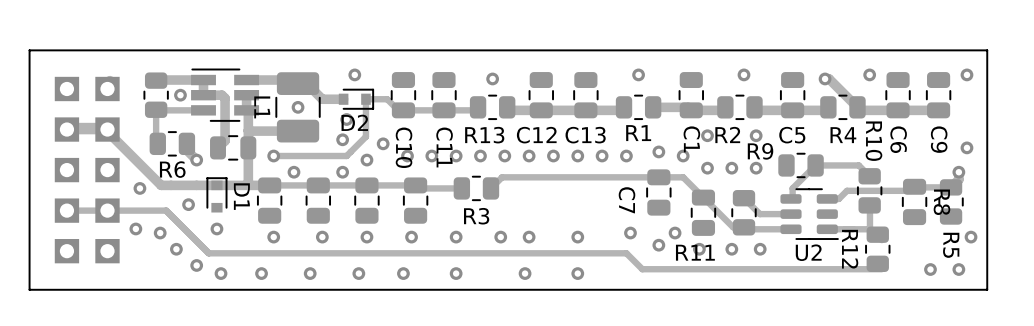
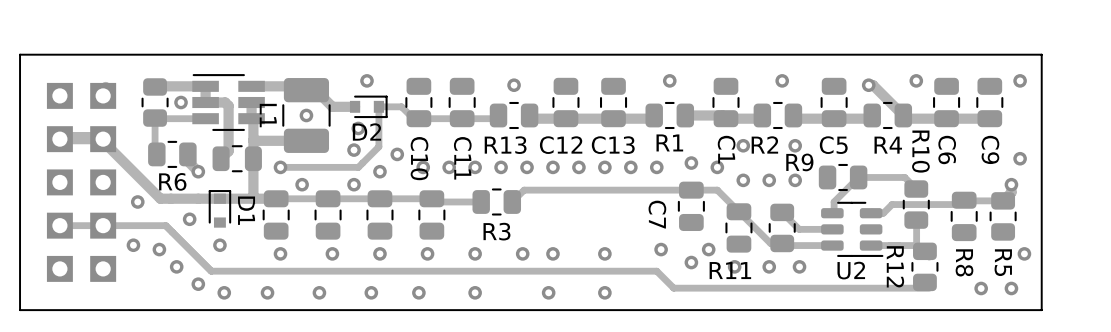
R8 name position: R8 (941, 202) -> R8 (964, 262)

